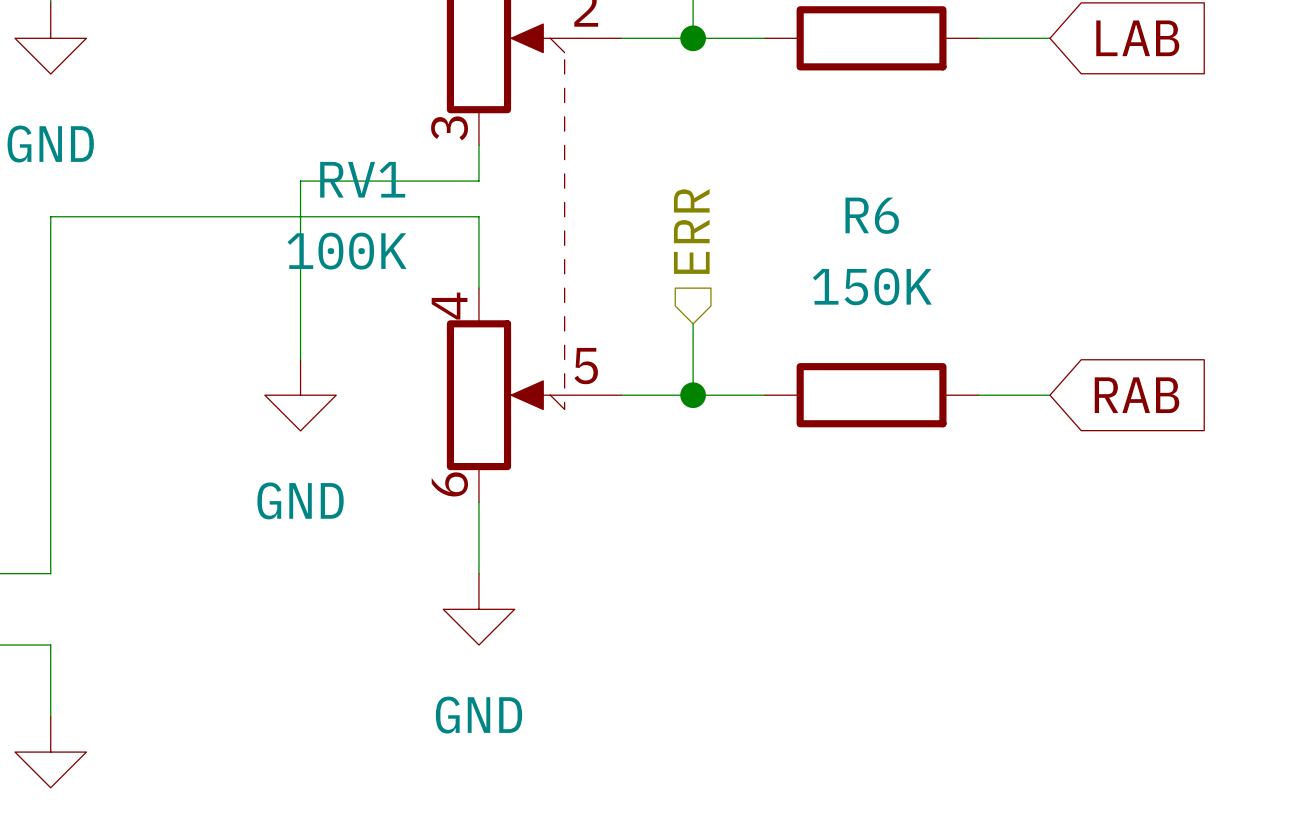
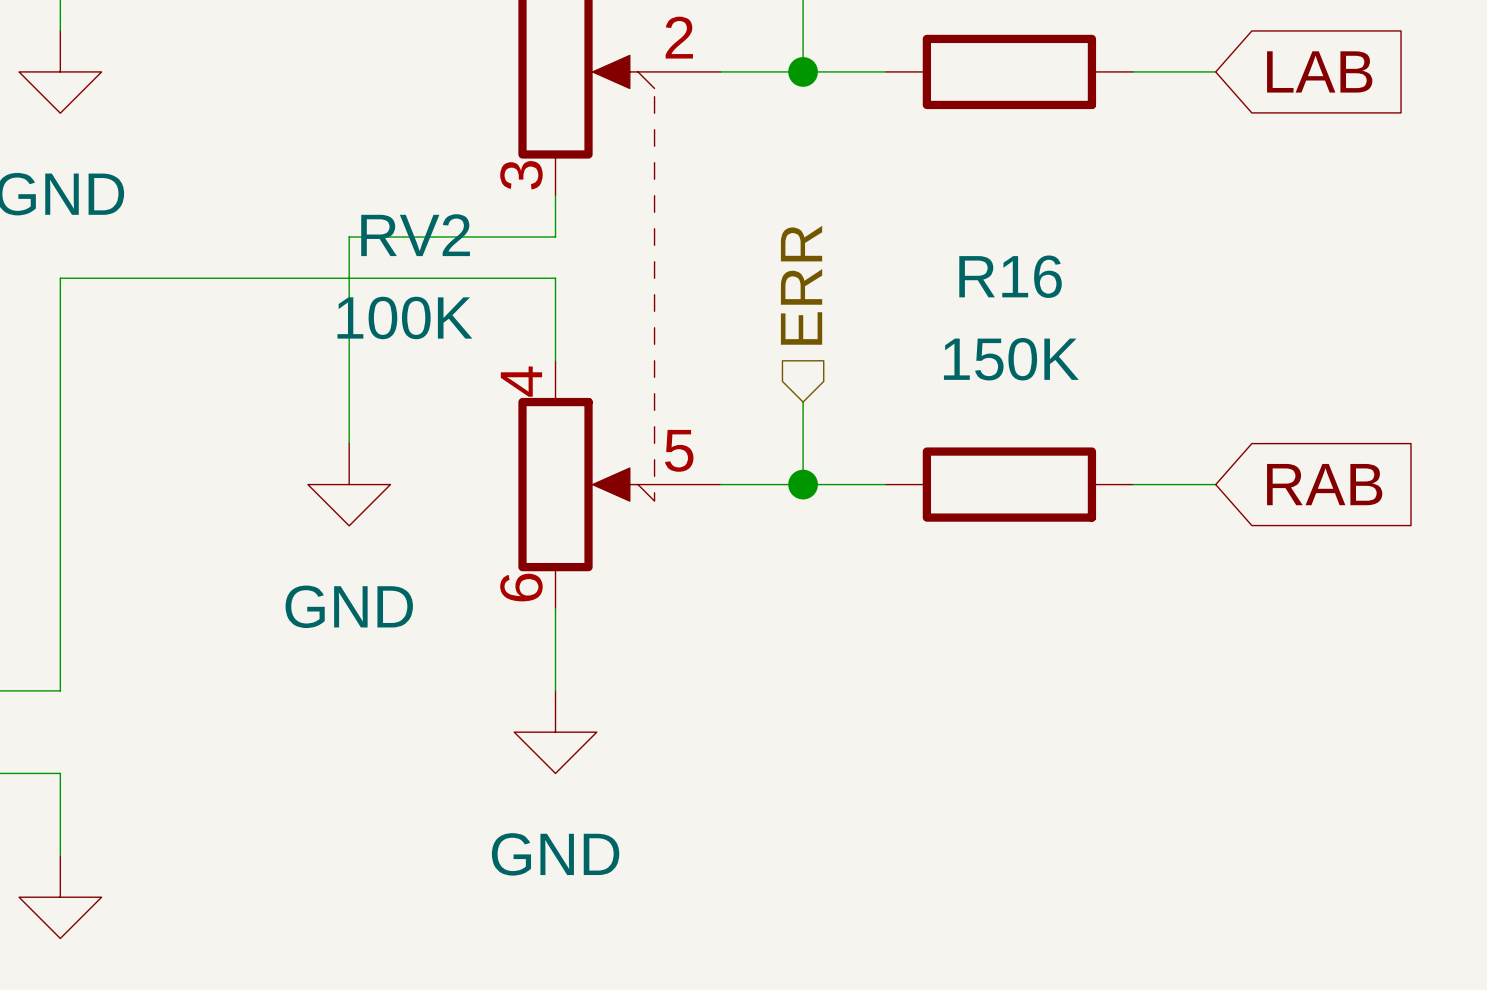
RV1 name: RV1 (362, 179) -> RV2 (415, 235)
R6 name: R6 (872, 215) -> R16 (1010, 276)

